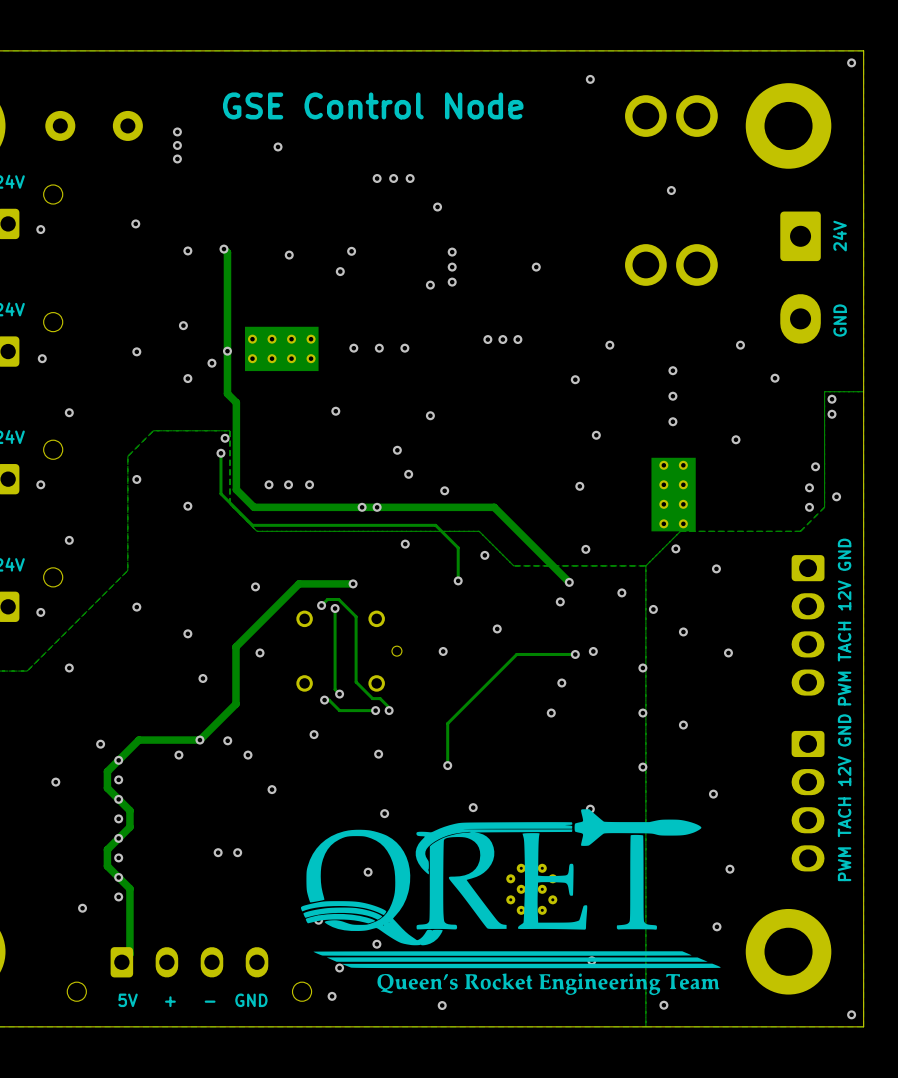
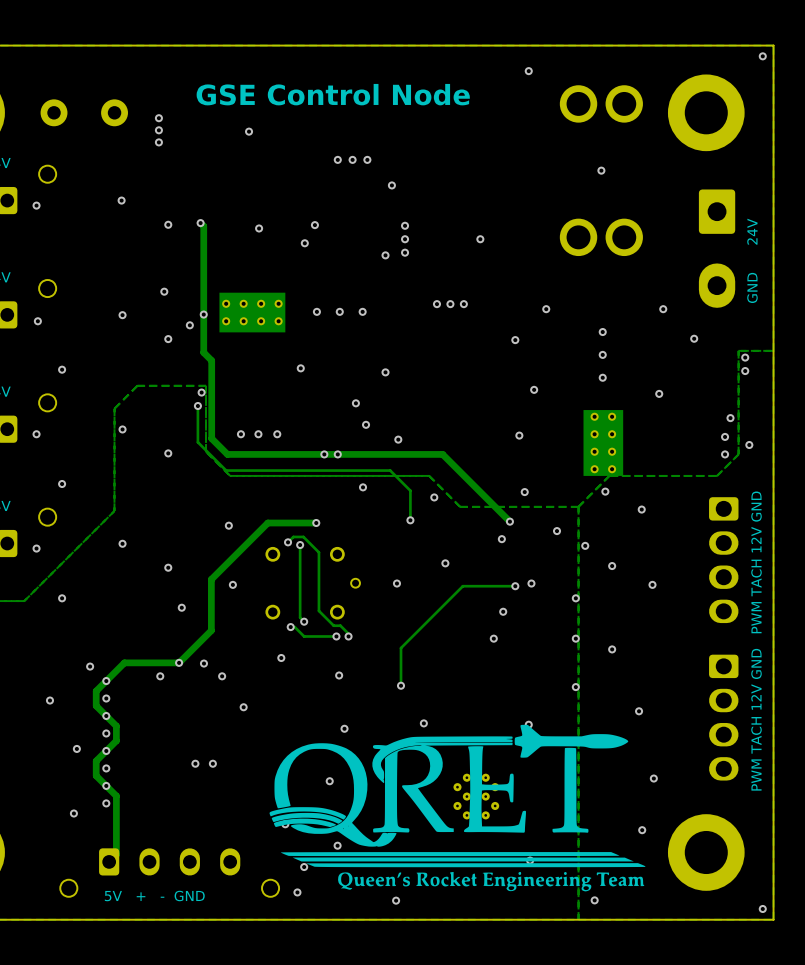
via: none -> (76, 748)

